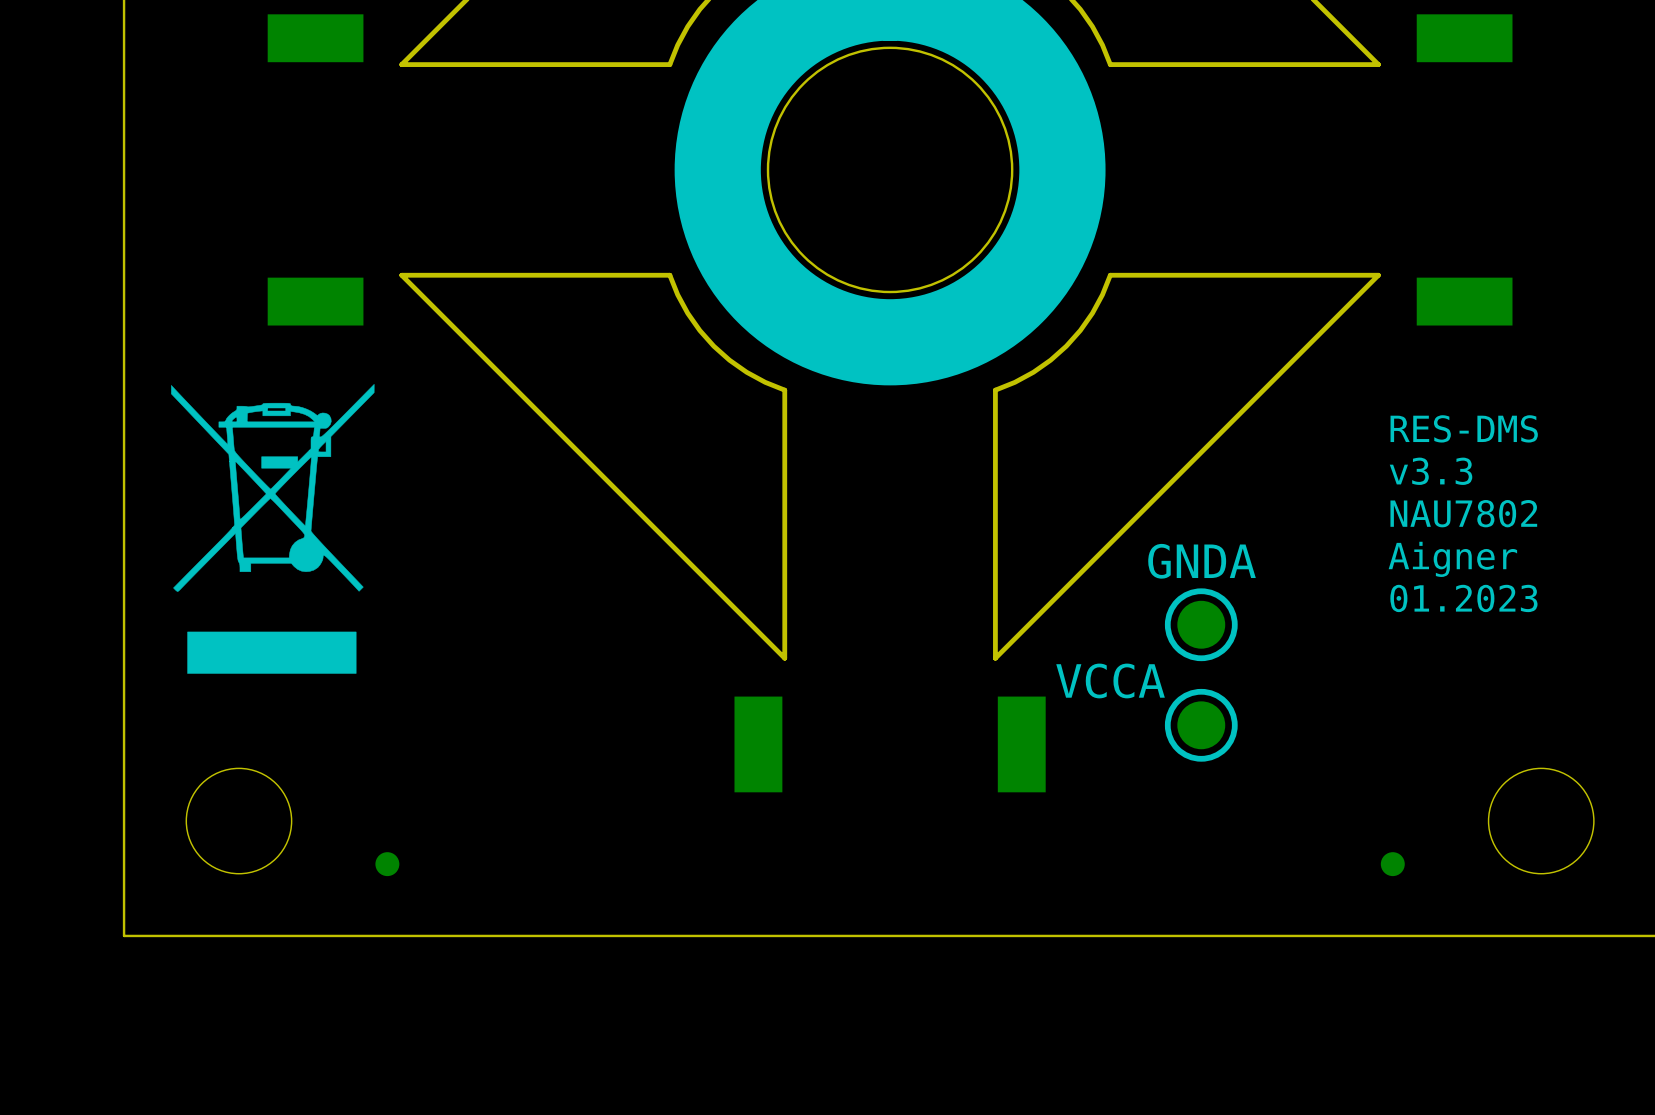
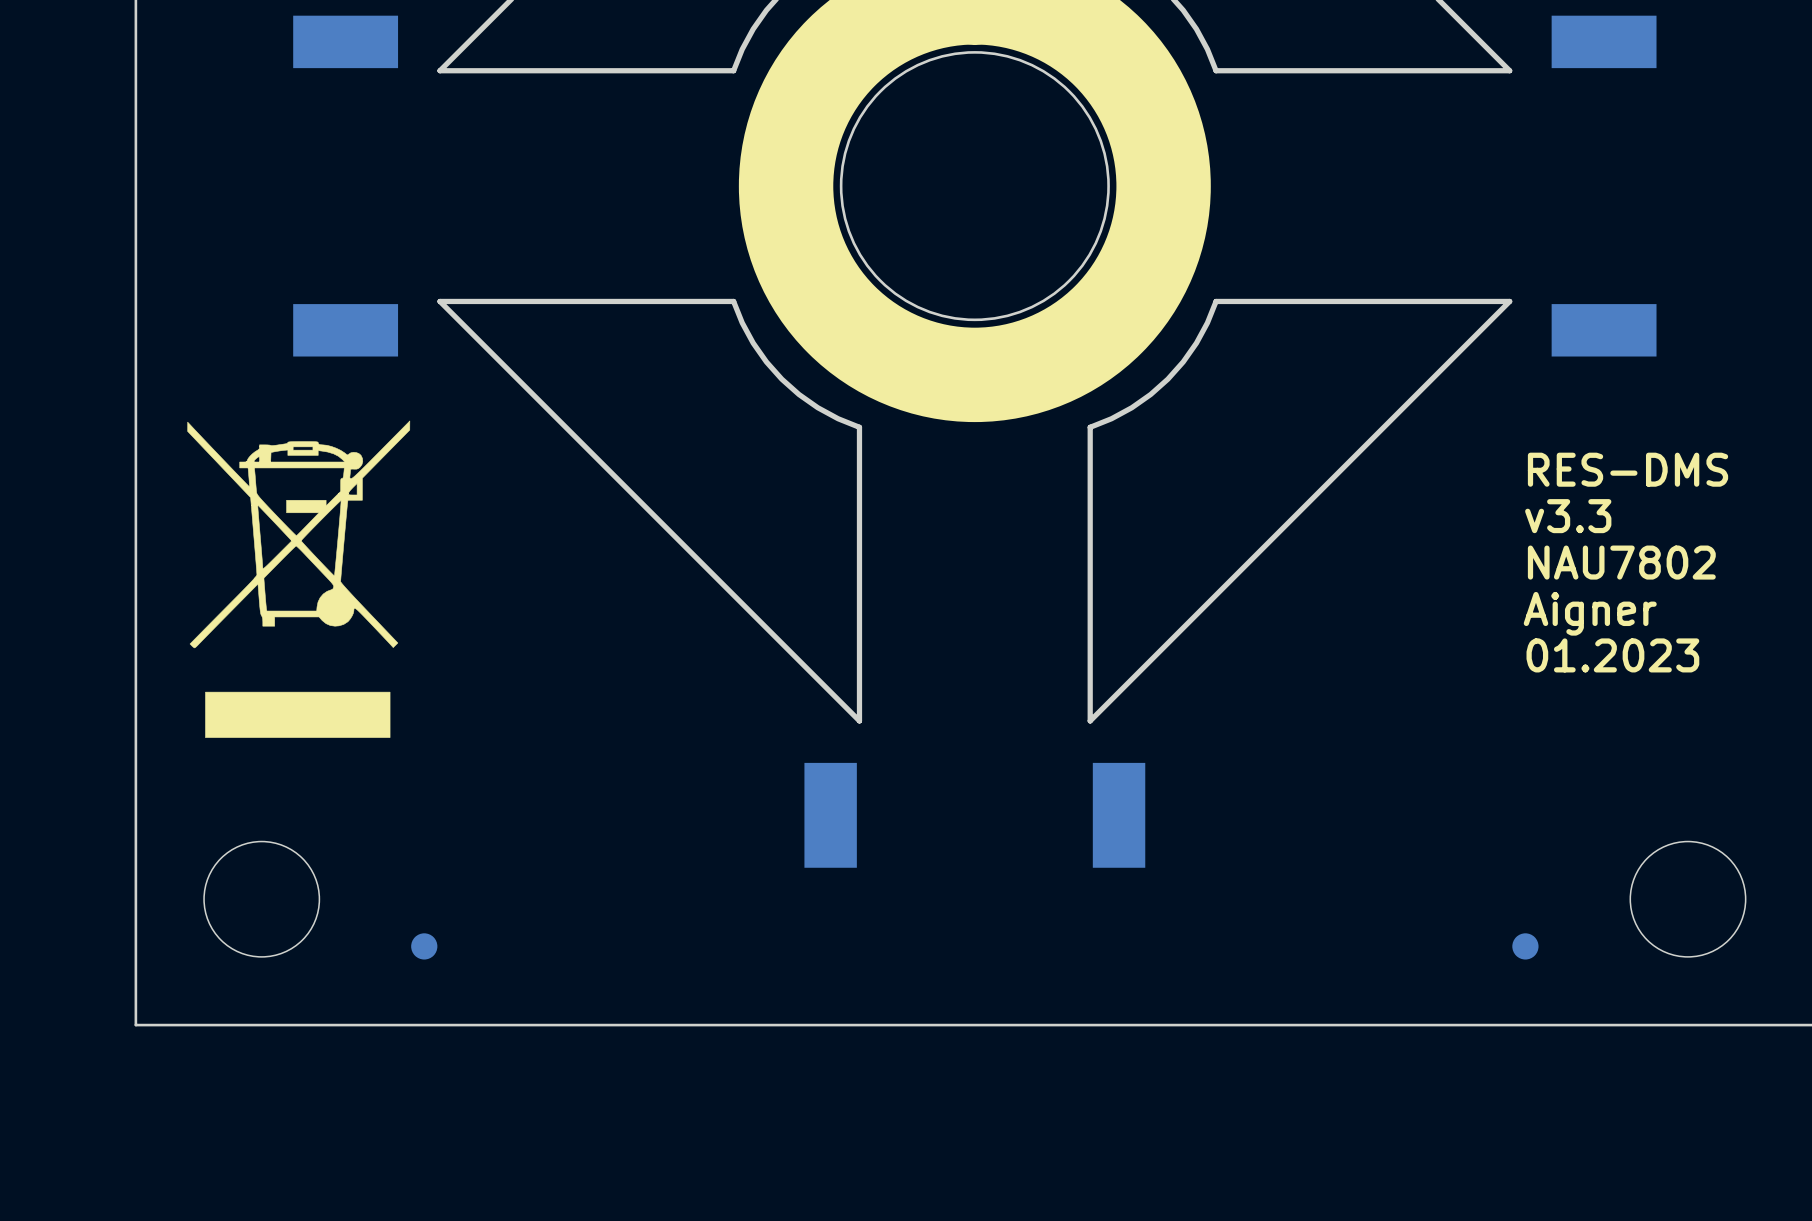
text: GNDA (1202, 561) -> none
part: (1201, 624) -> none
text: VCCA (1110, 680) -> none
part: (1201, 725) -> none

